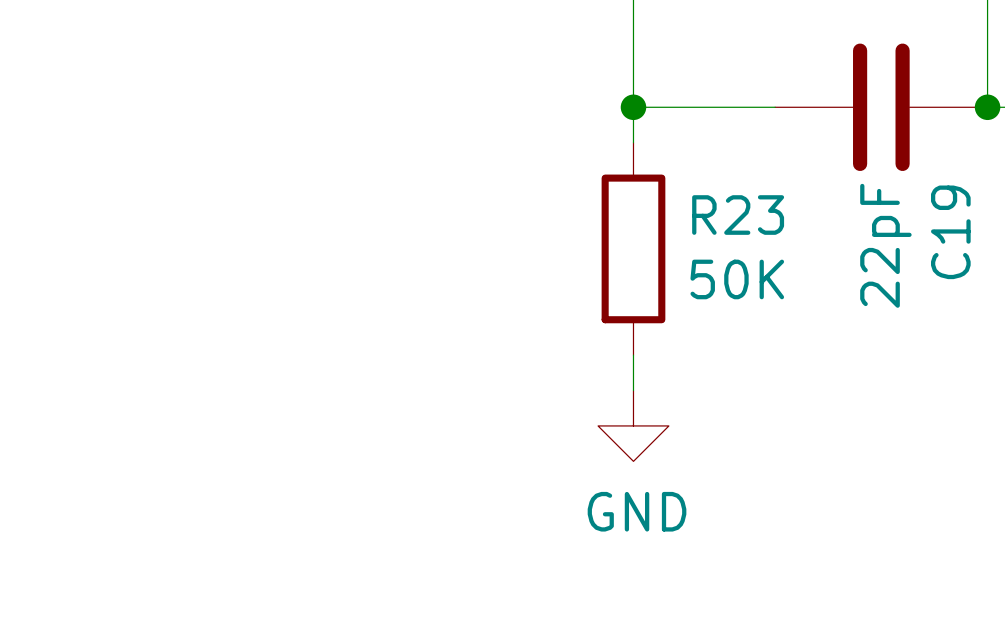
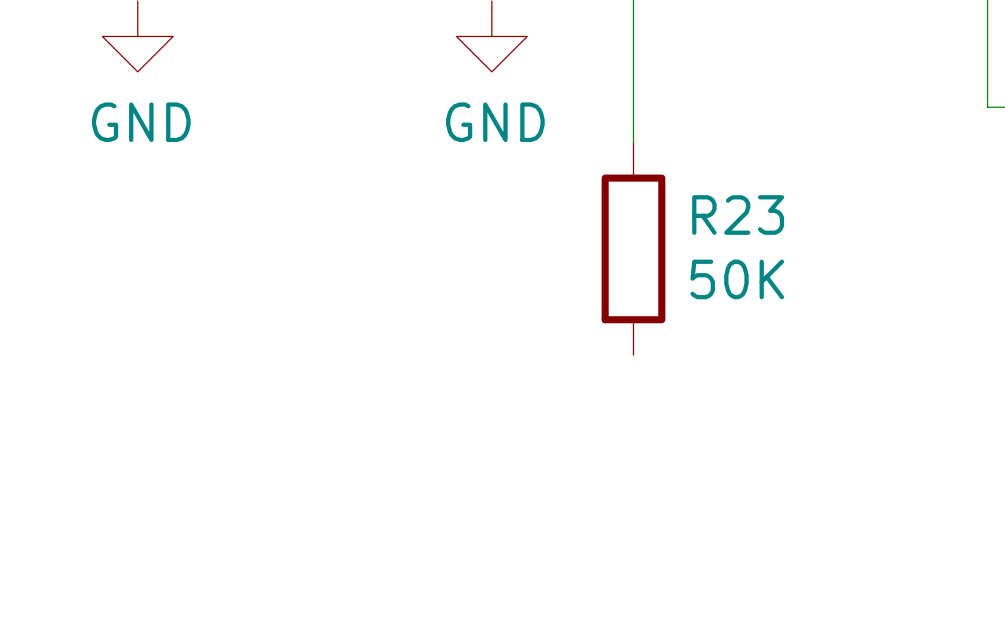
power symbol: none -> GND (137, 36)
power symbol: none -> GND (491, 36)
wire: (633, 107) (775, 107) -> none
junction: (633, 107) -> none
C19: 22pF (881, 107) -> none
junction: (987, 107) -> none
wire: (633, 355) (633, 390) -> none
power symbol: GND (633, 425) -> none

